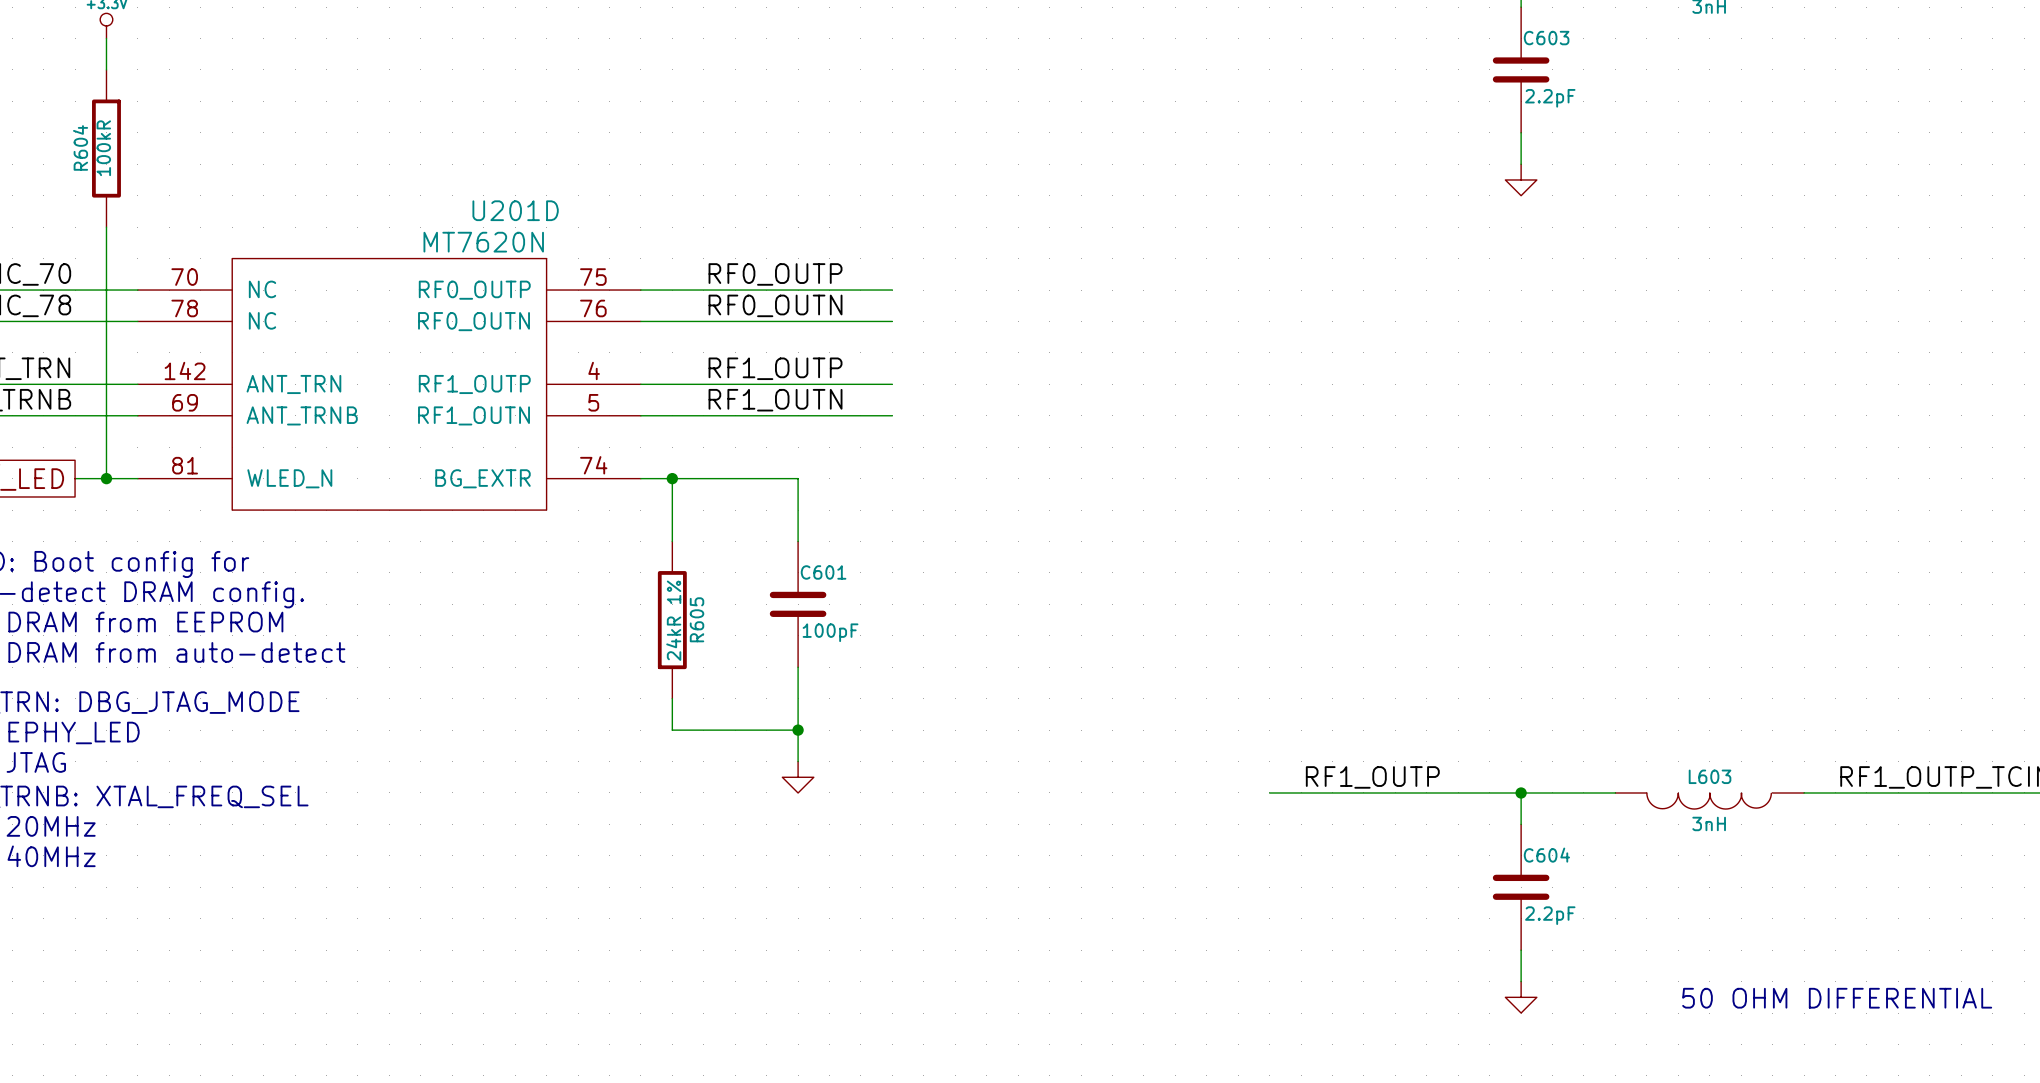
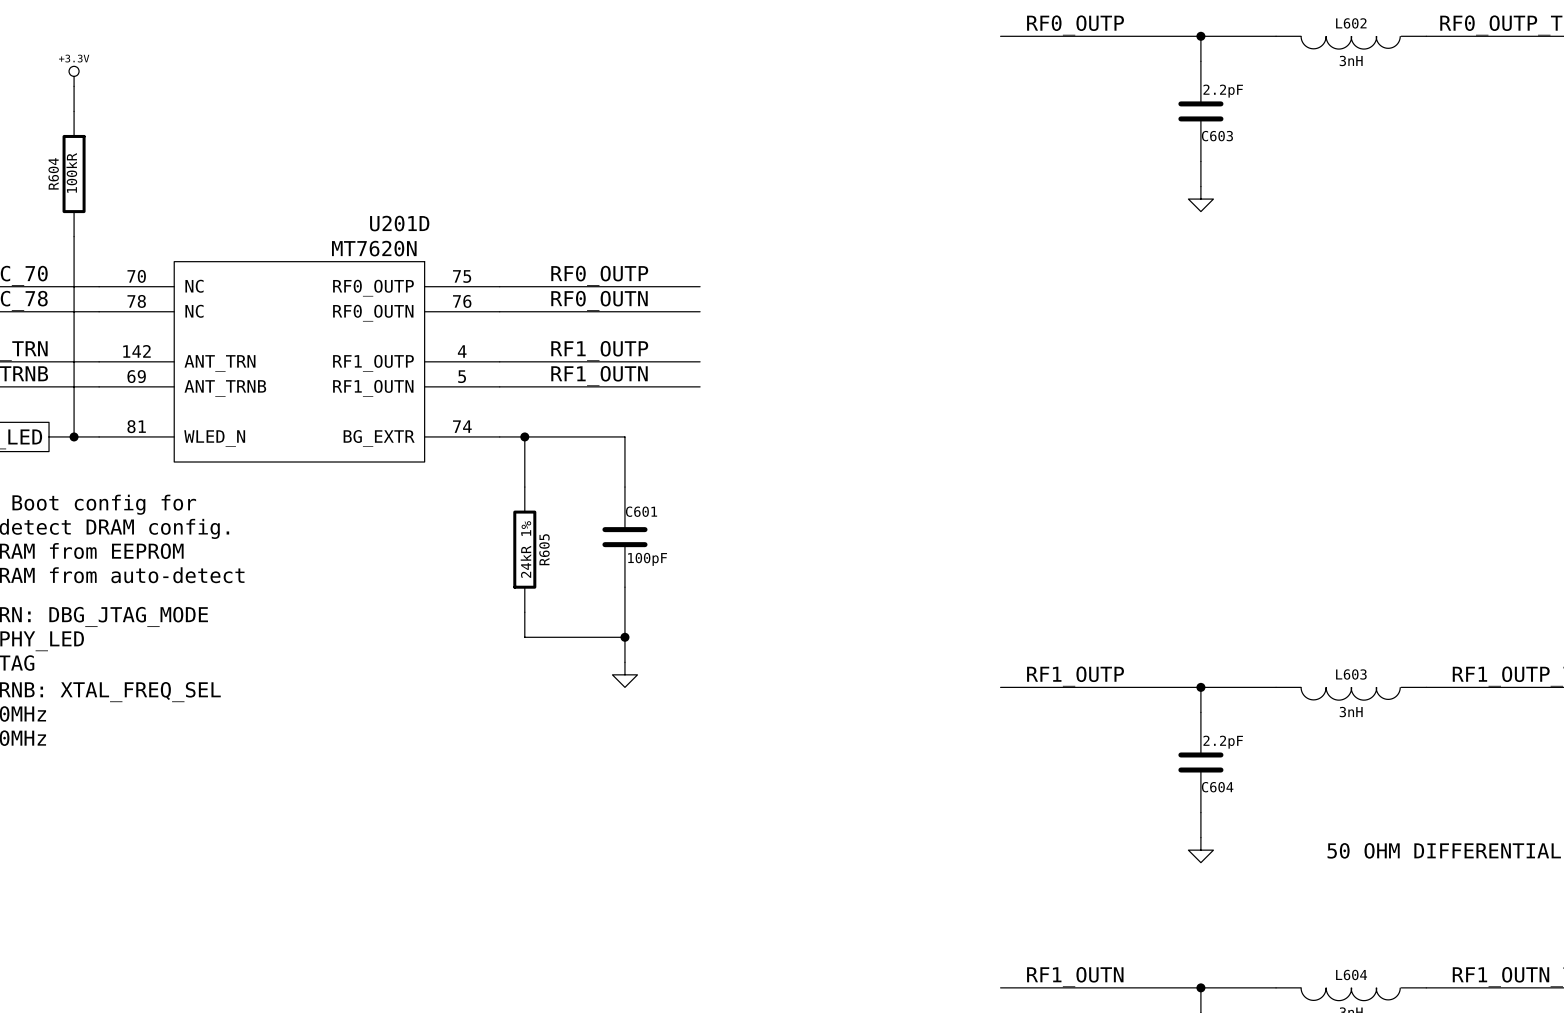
C603 name position: C603 (1546, 38) -> C603 (1217, 136)
C603 value position: 2.2pF (1550, 98) -> 2.2pF (1223, 91)
C604 name position: C604 (1546, 855) -> C604 (1217, 787)
C604 value position: 2.2pF (1550, 915) -> 2.2pF (1223, 742)

